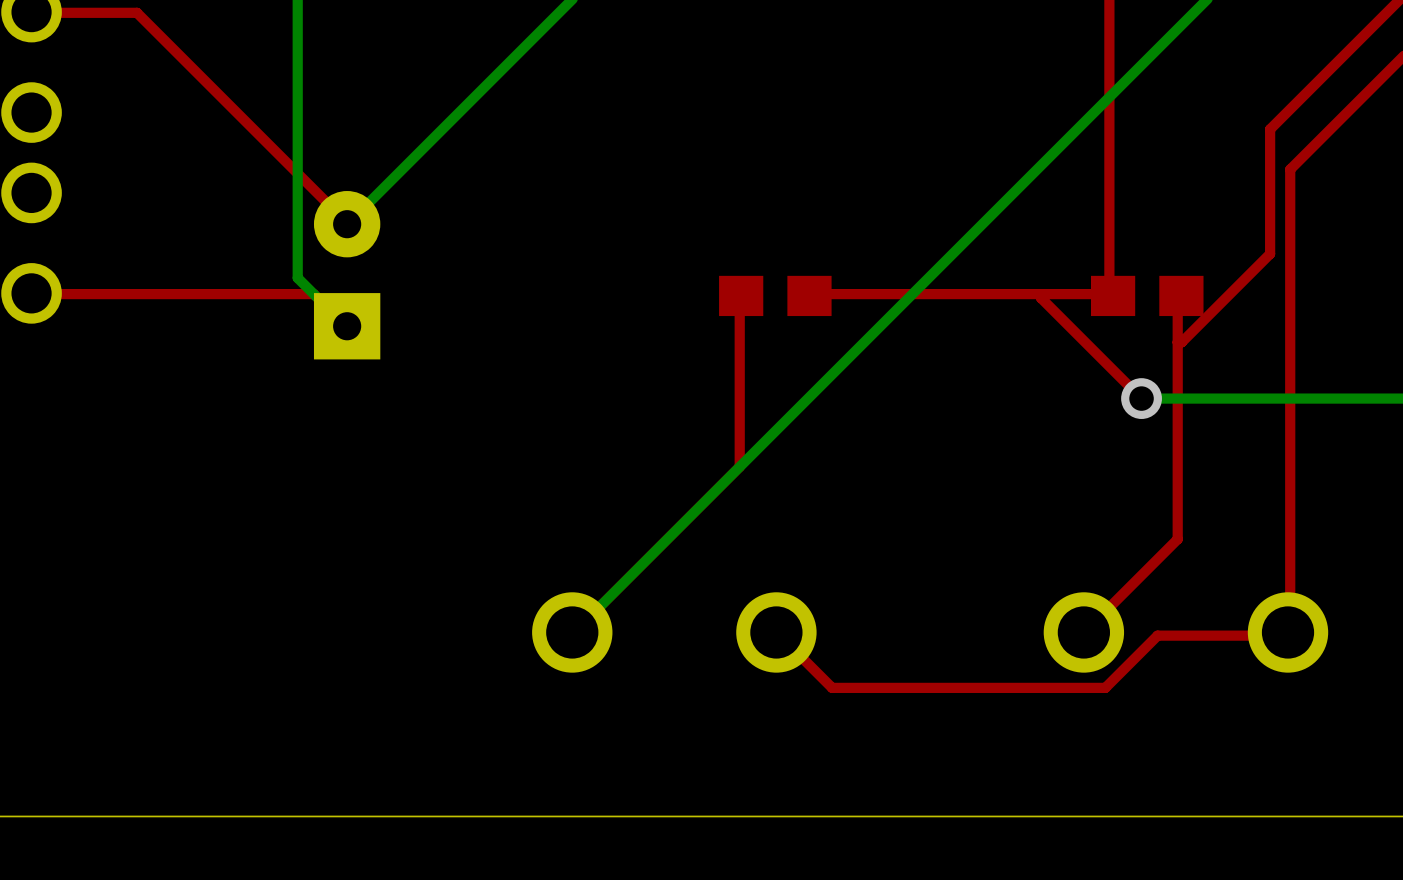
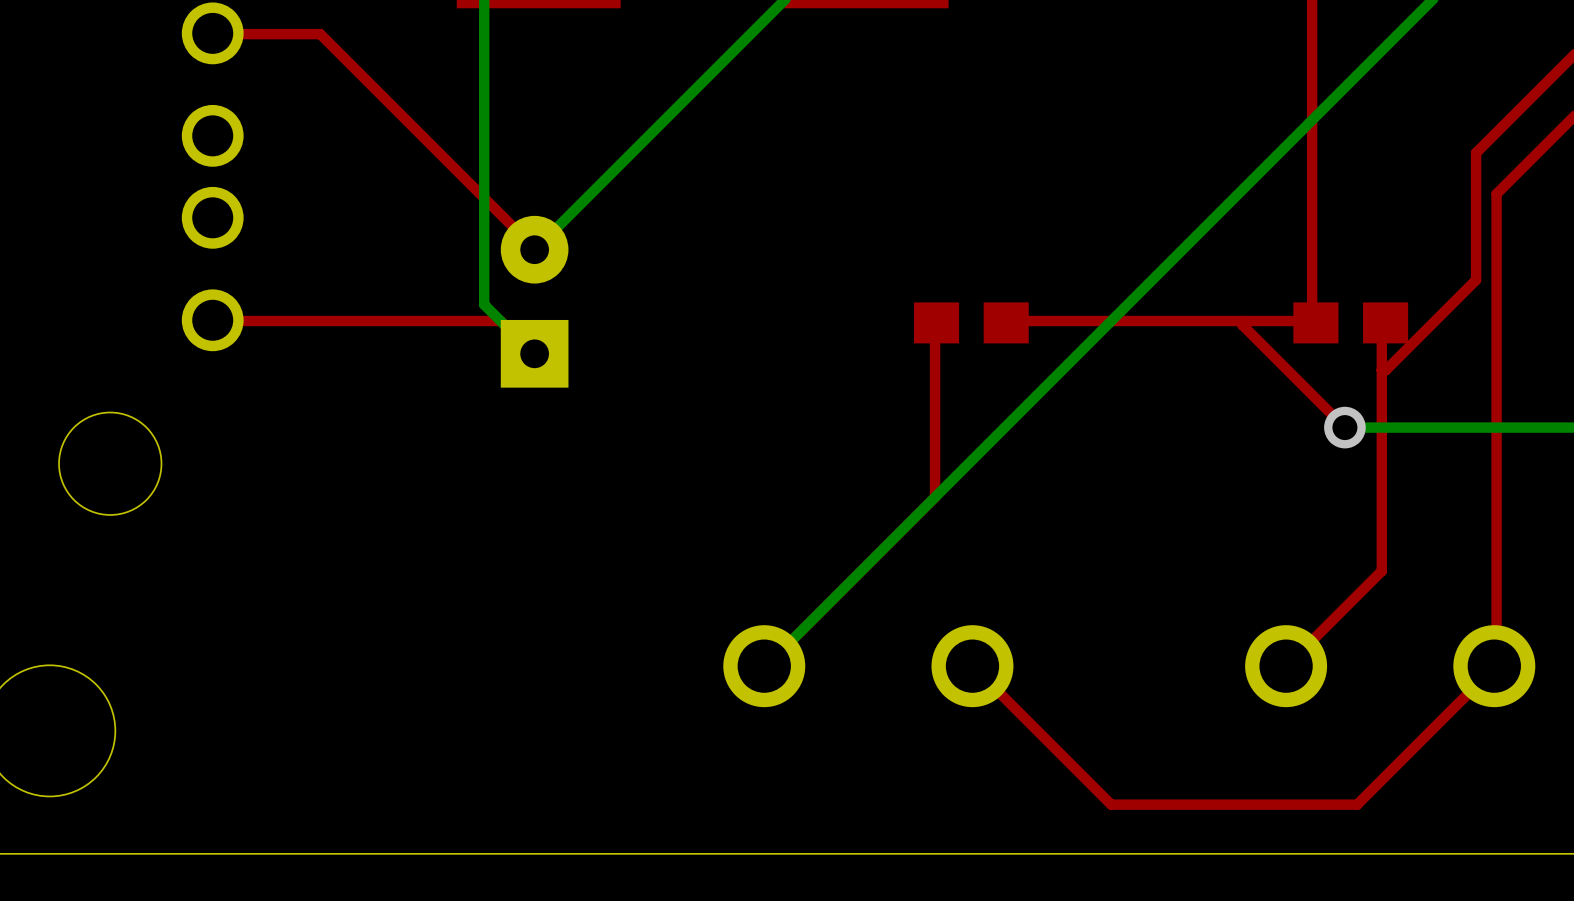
top track: (1286, 635) (1157, 635) (1105, 687) (832, 687) -> (1492, 669) (1357, 804) (1111, 804) (1029, 722)

